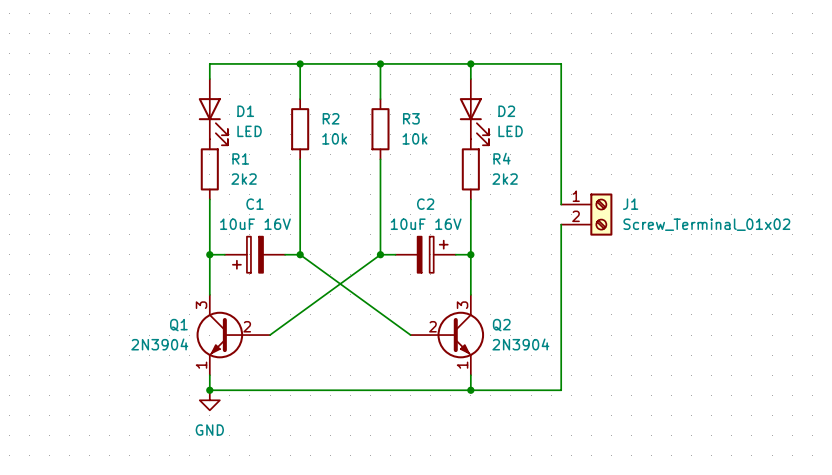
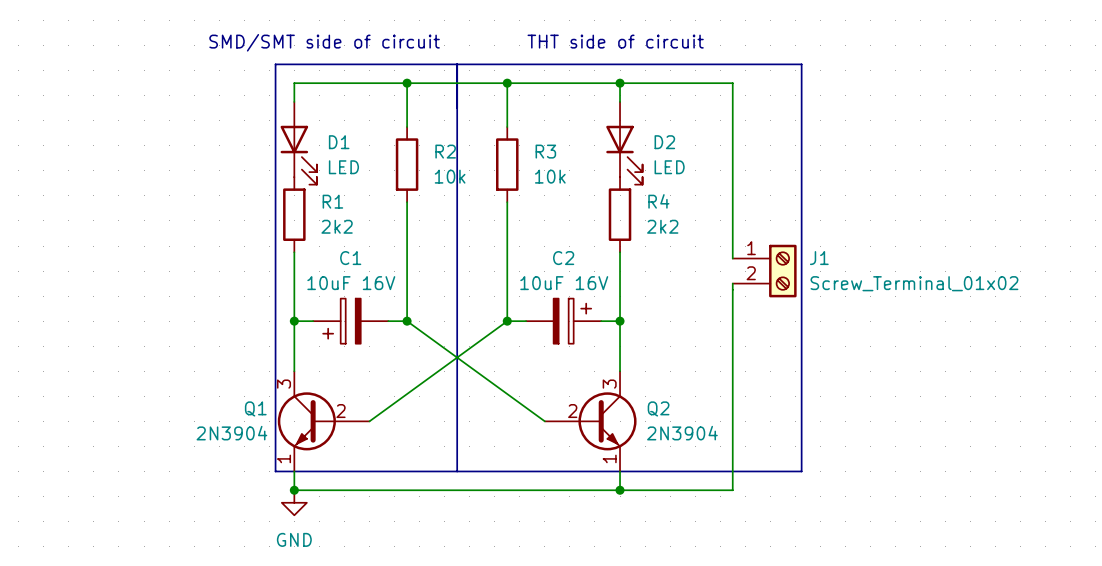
text: none -> THT side of circuit (615, 41)
text: none -> SMD/SMT side of circuit (324, 42)
line: none -> (275, 64) (801, 64) (801, 471) (275, 471) (275, 64)
line: none -> (457, 64) (457, 471)

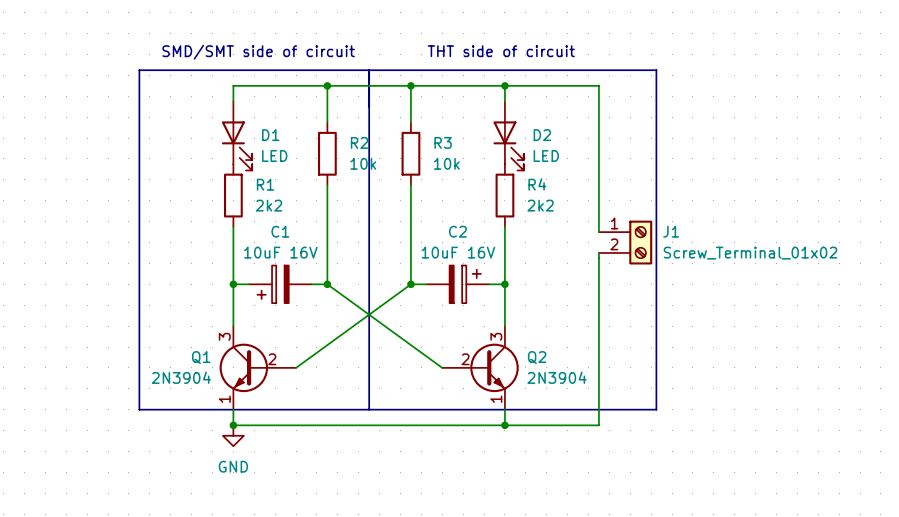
line: (275, 64) (275, 471) -> (217, 70) (139, 70) (139, 409) (217, 409)

